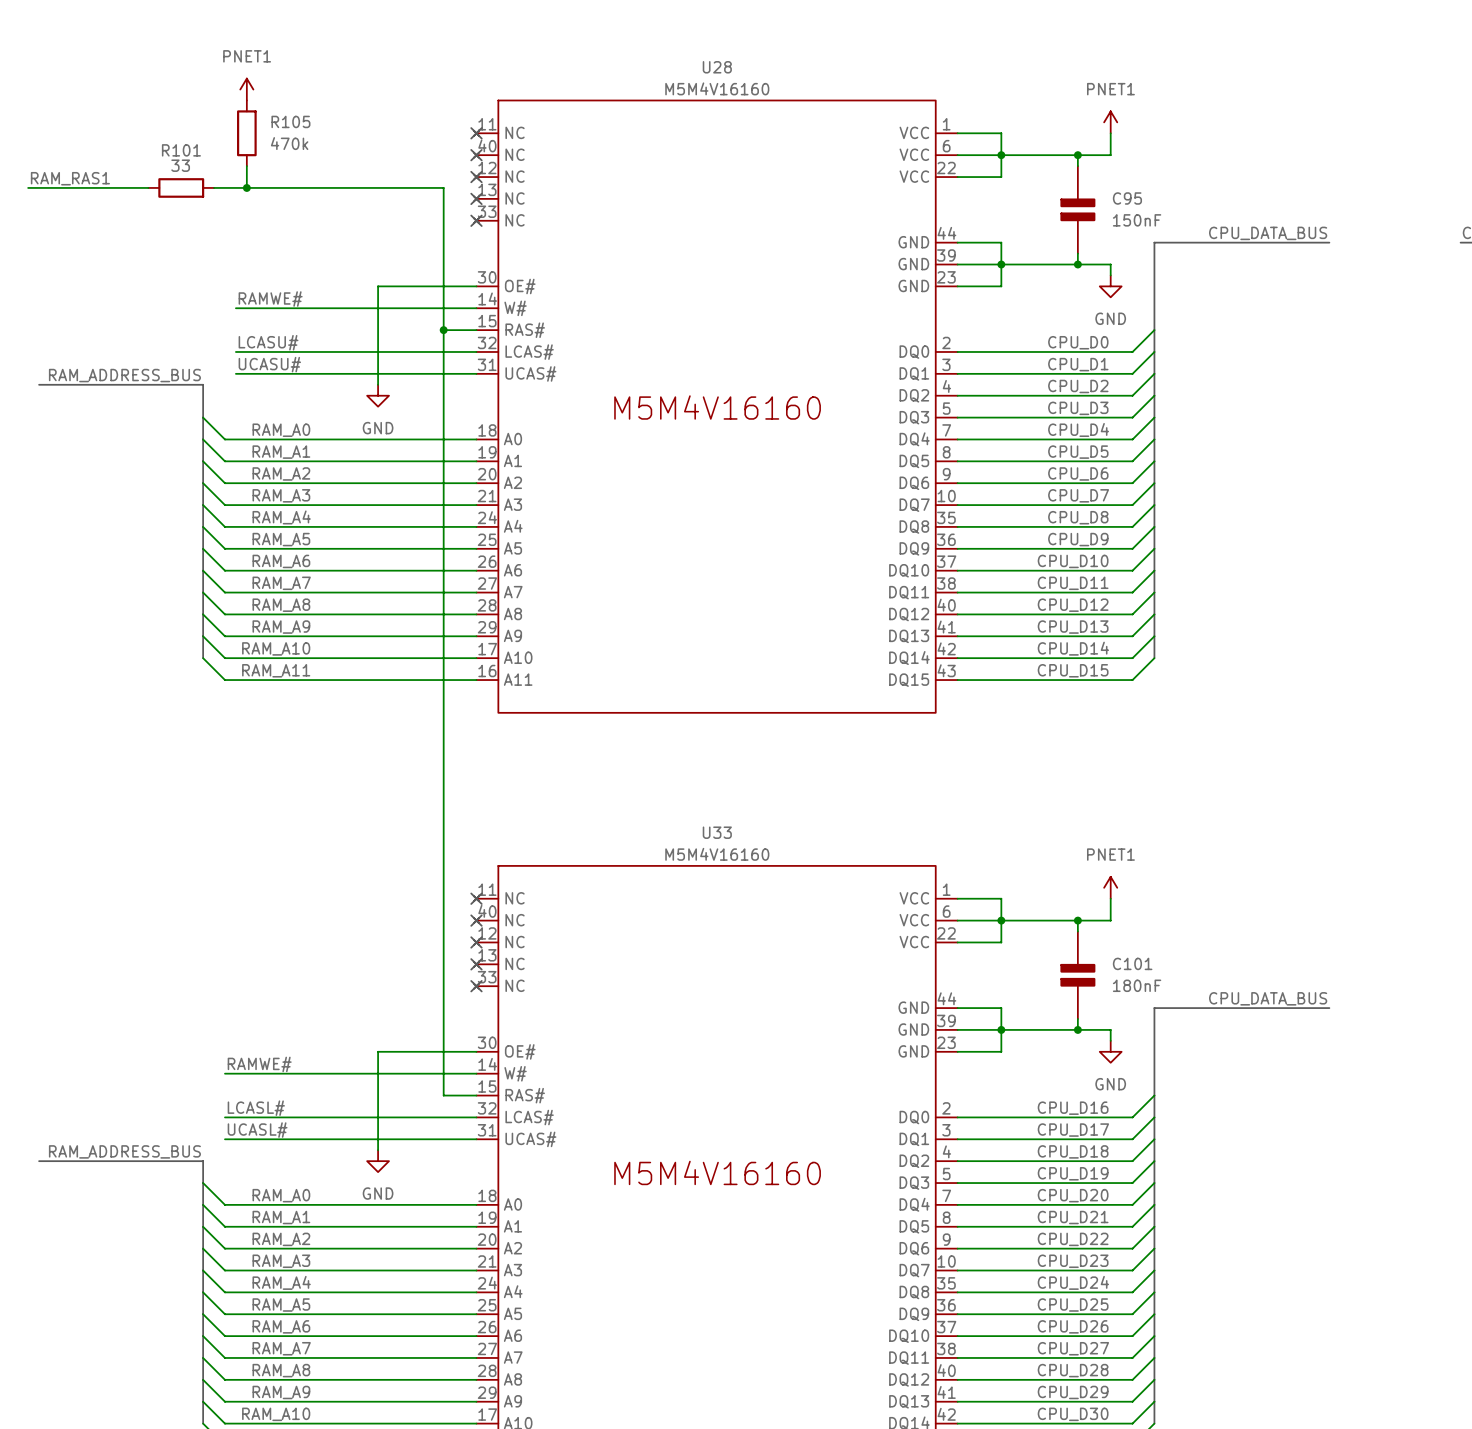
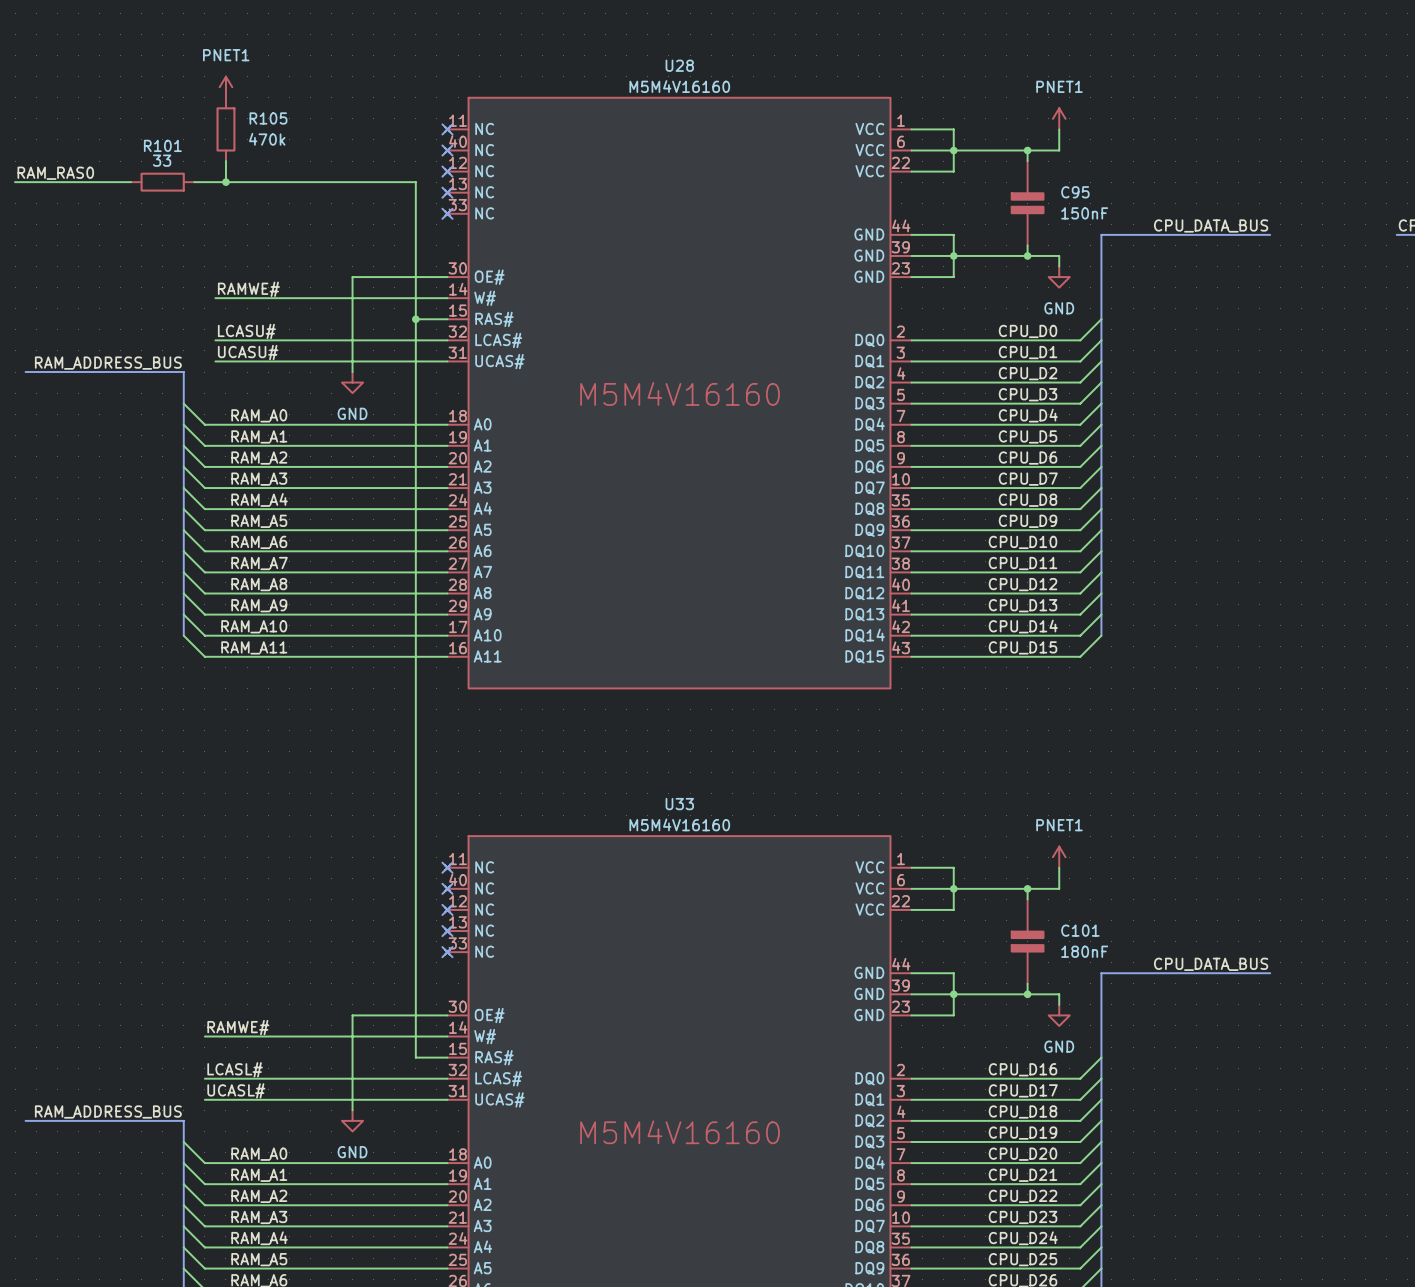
label: RAM_RAS1 (70, 178) -> RAM_RAS0 (55, 173)

